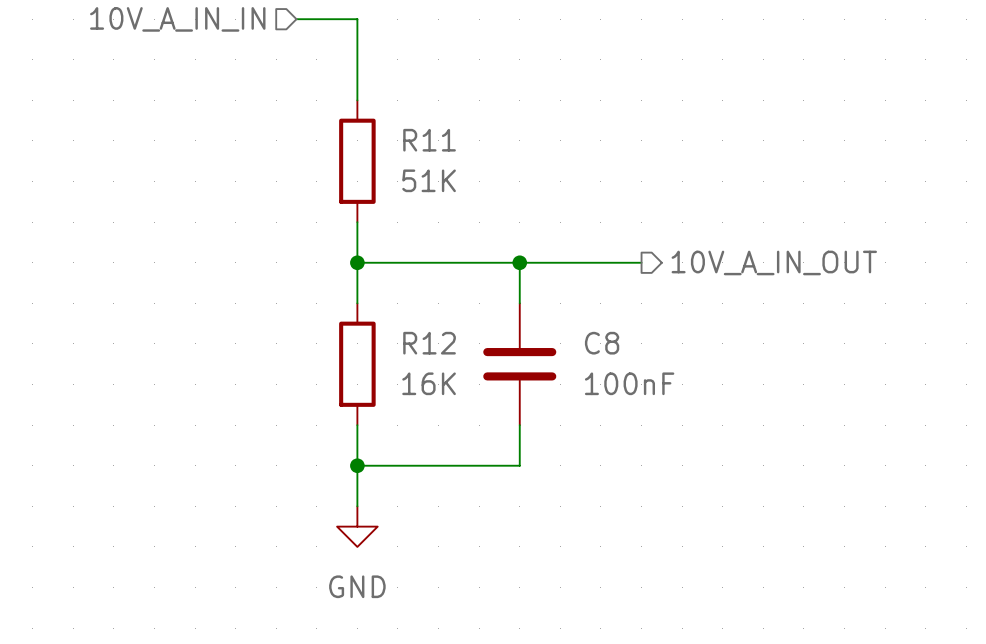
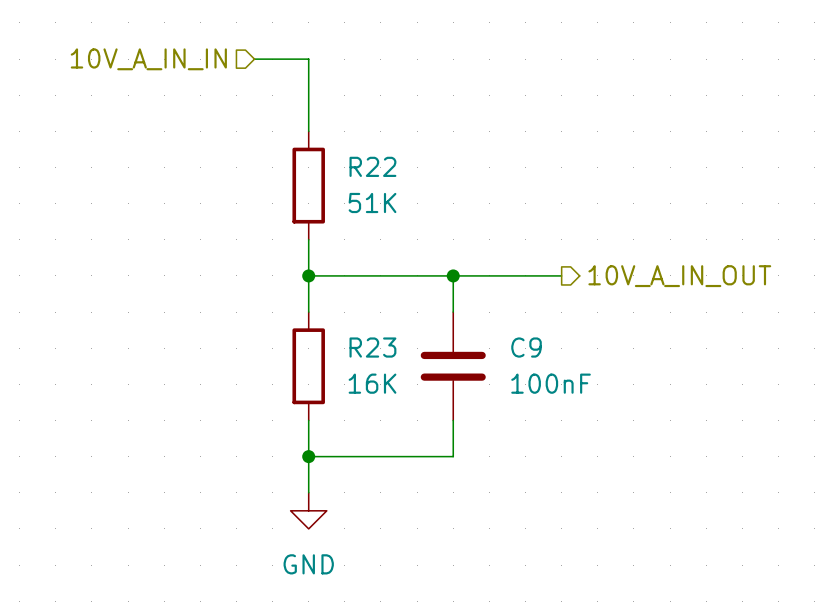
R11 name: R11 (429, 140) -> R22 (372, 166)
R12 name: R12 (429, 343) -> R23 (372, 347)
C8 name: C8 (602, 343) -> C9 (526, 347)

